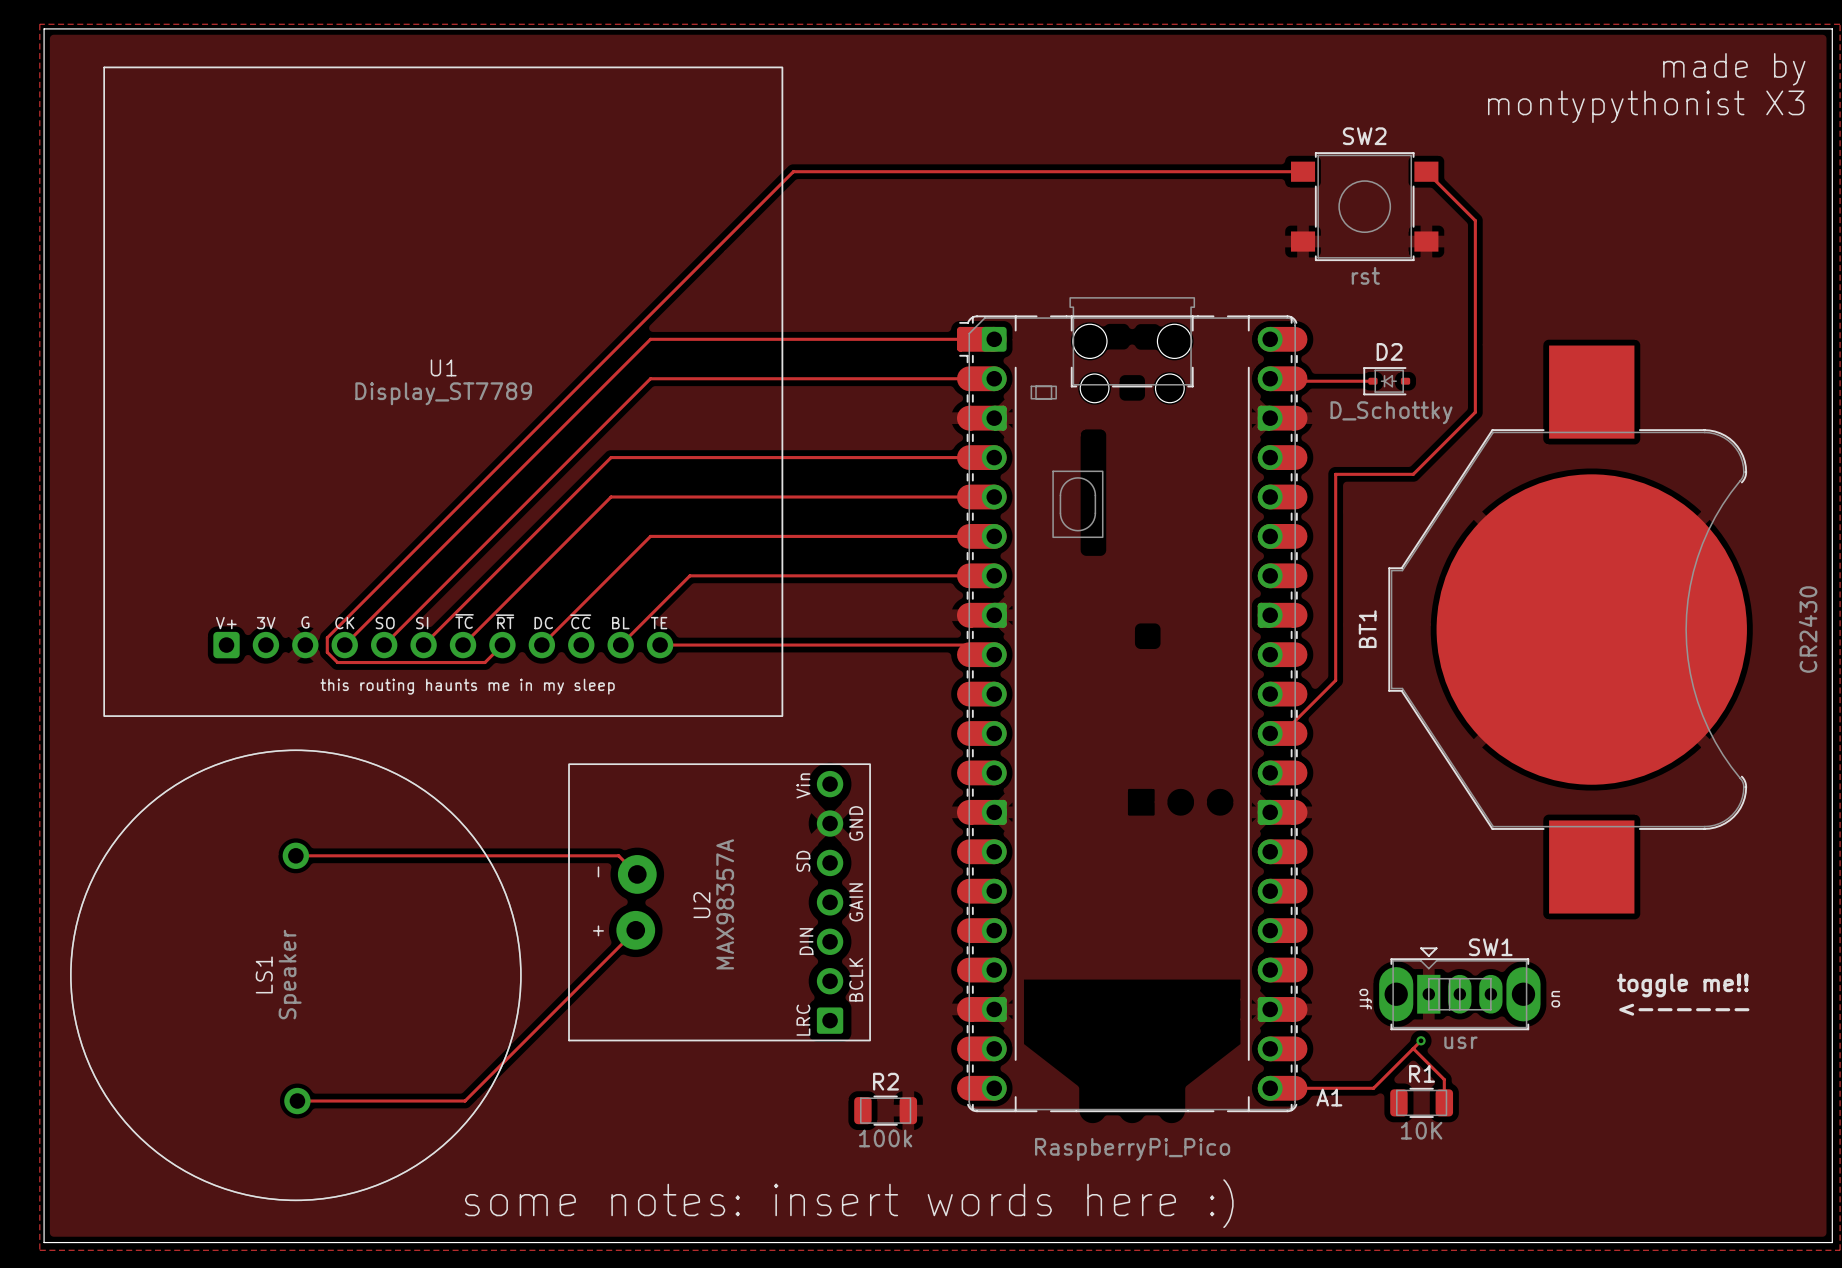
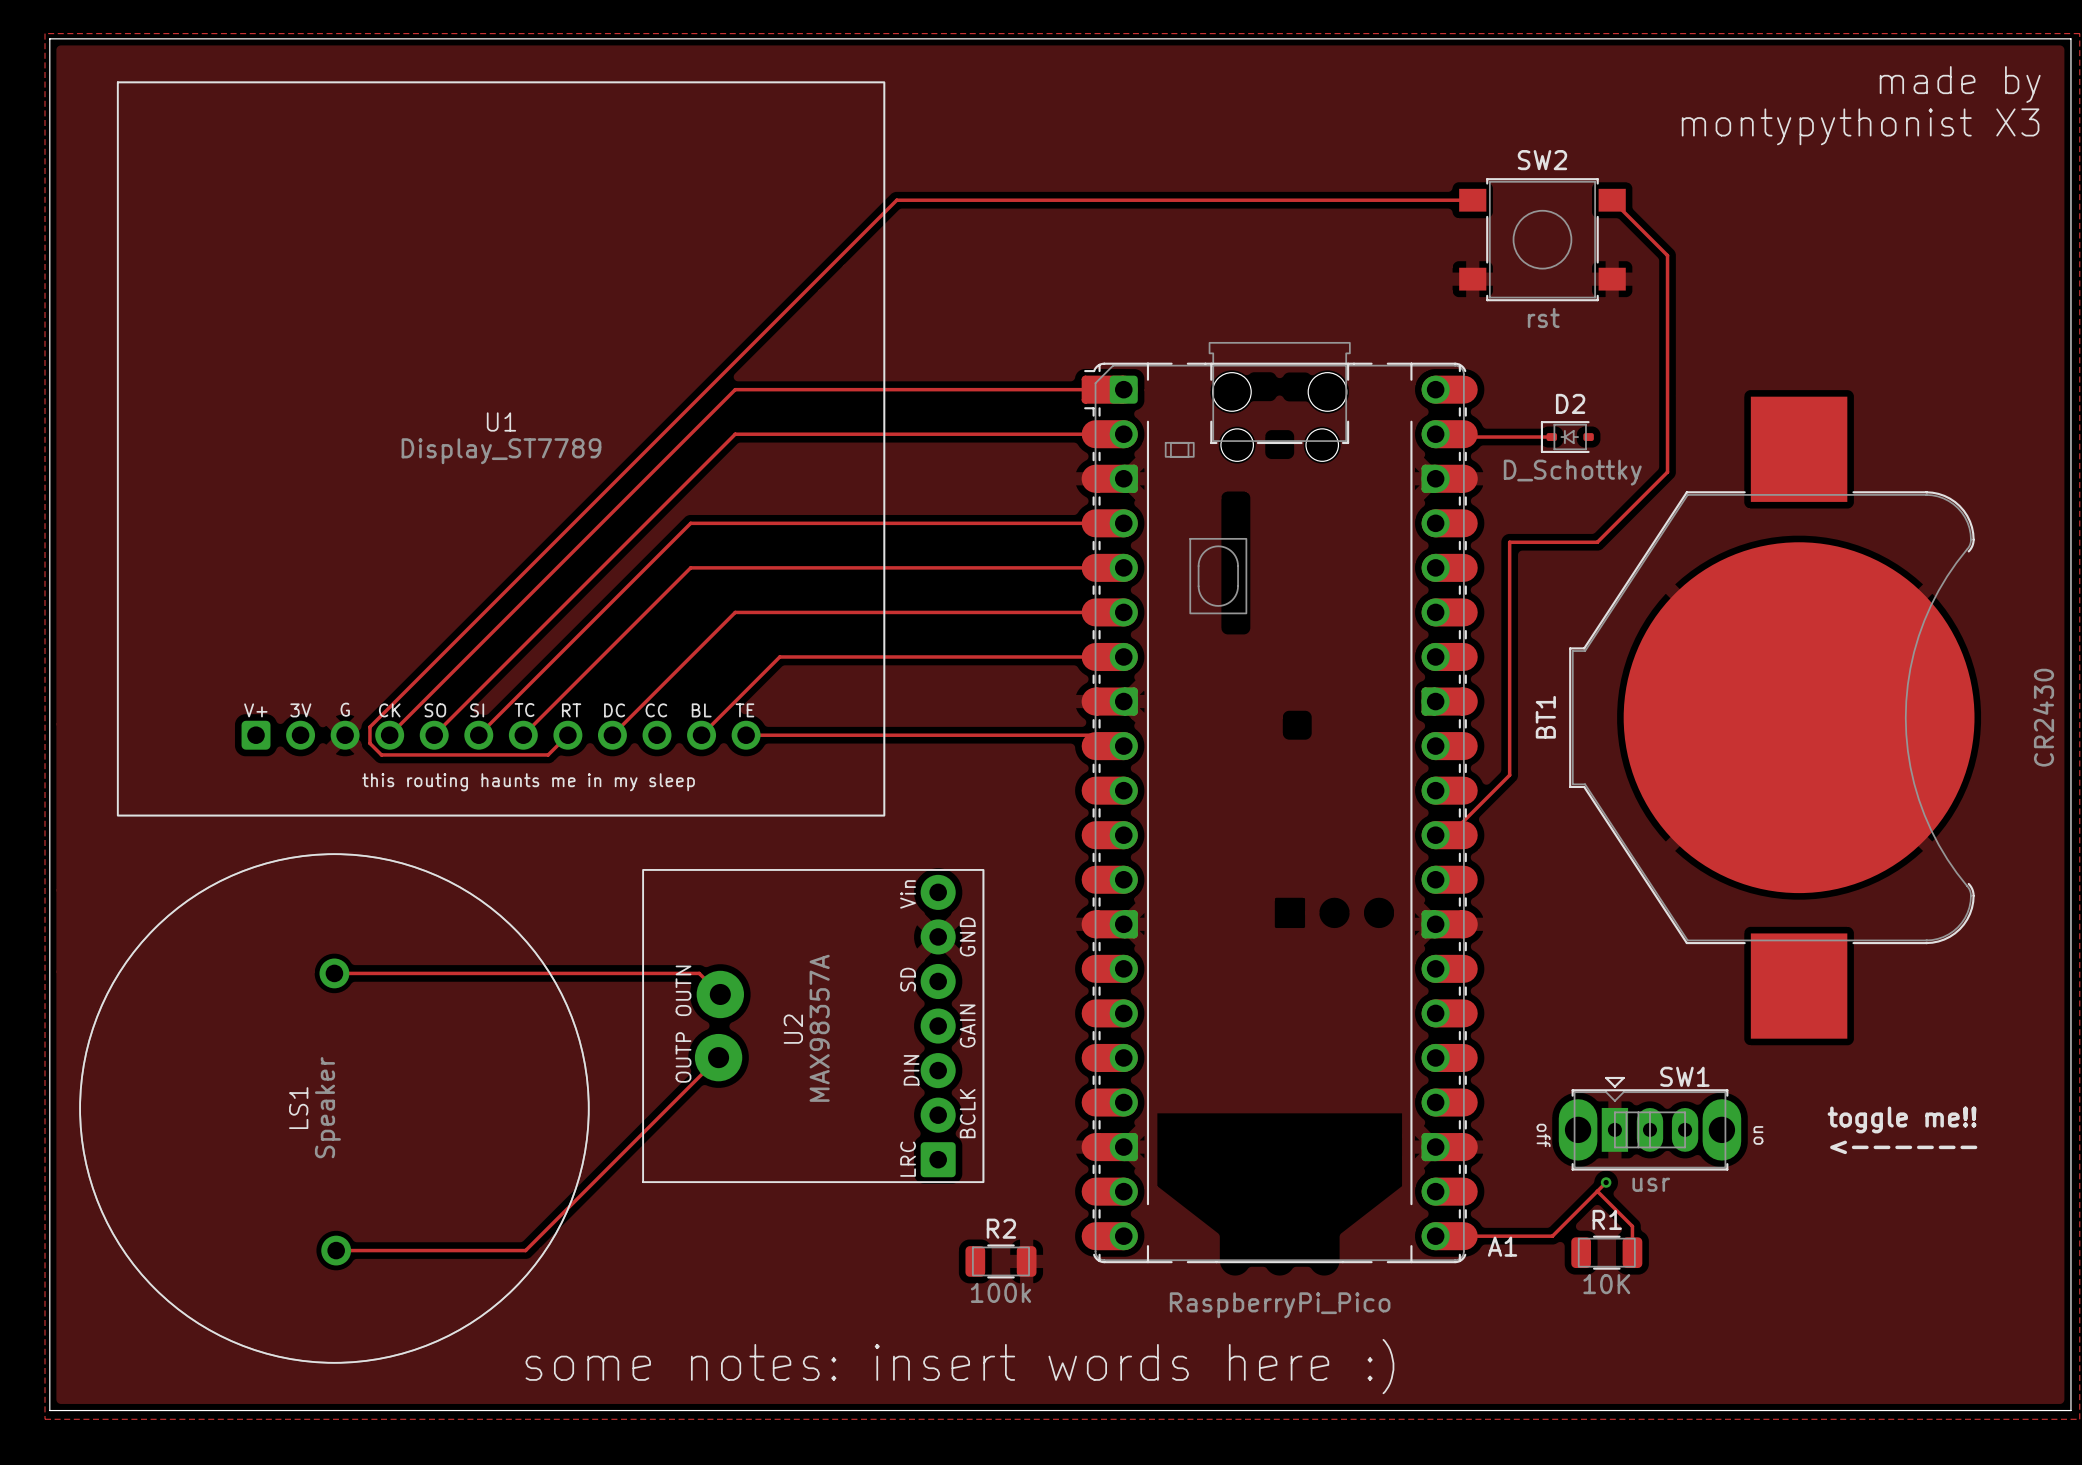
U1 footprint: [103, 66, 784, 717] -> [116, 81, 886, 817]
U2 footprint: [568, 763, 871, 1042] -> [642, 869, 985, 1184]

